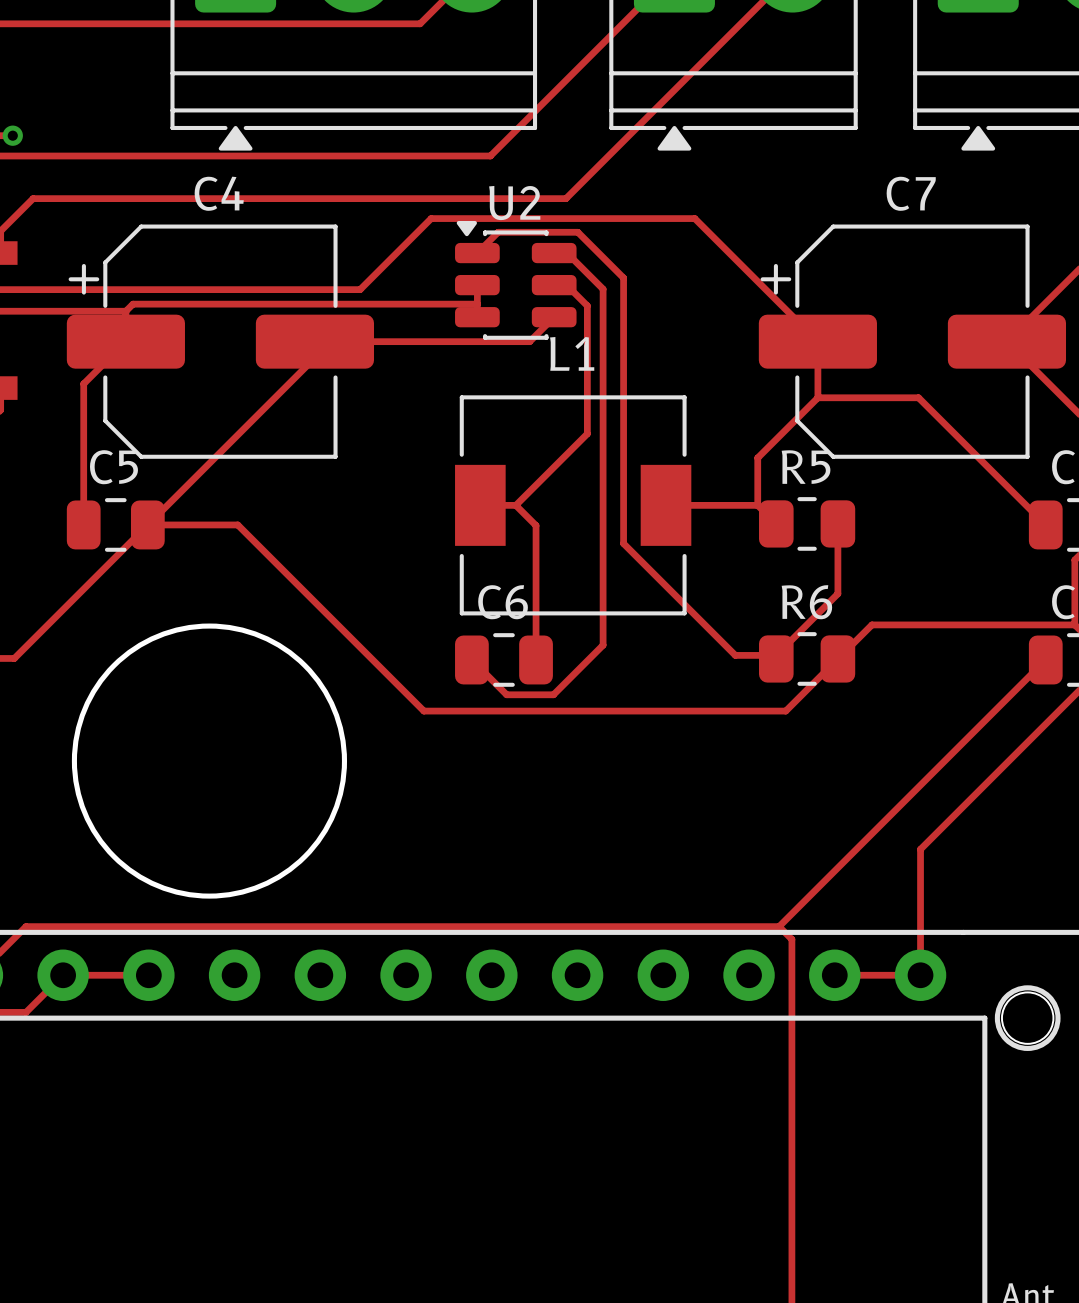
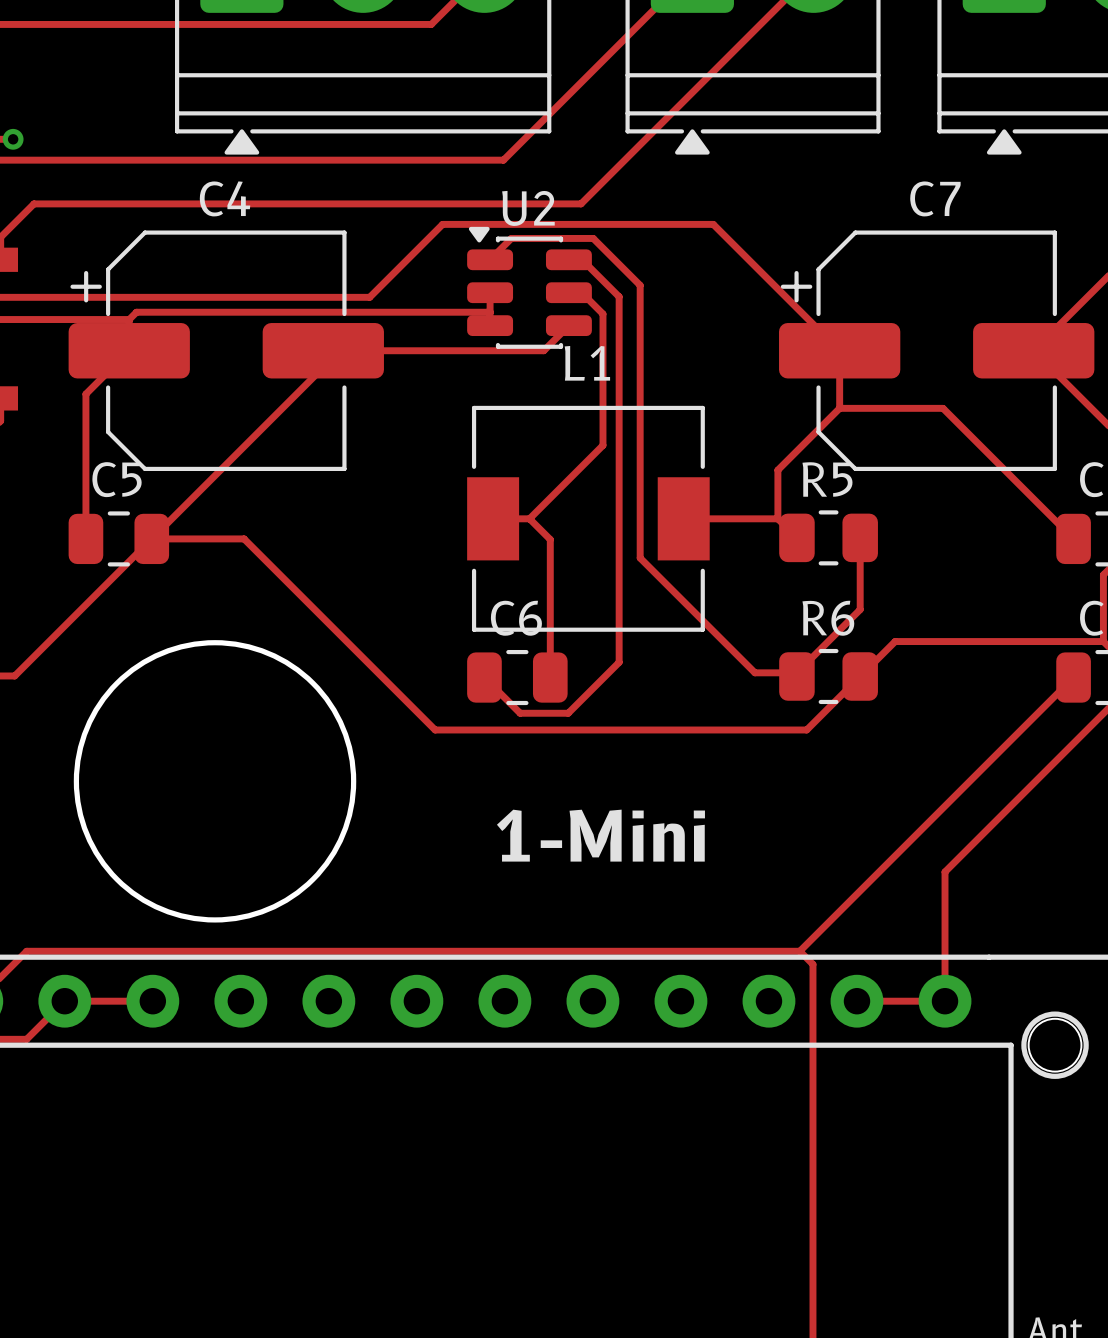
text: none -> 1-Mini (600, 835)

